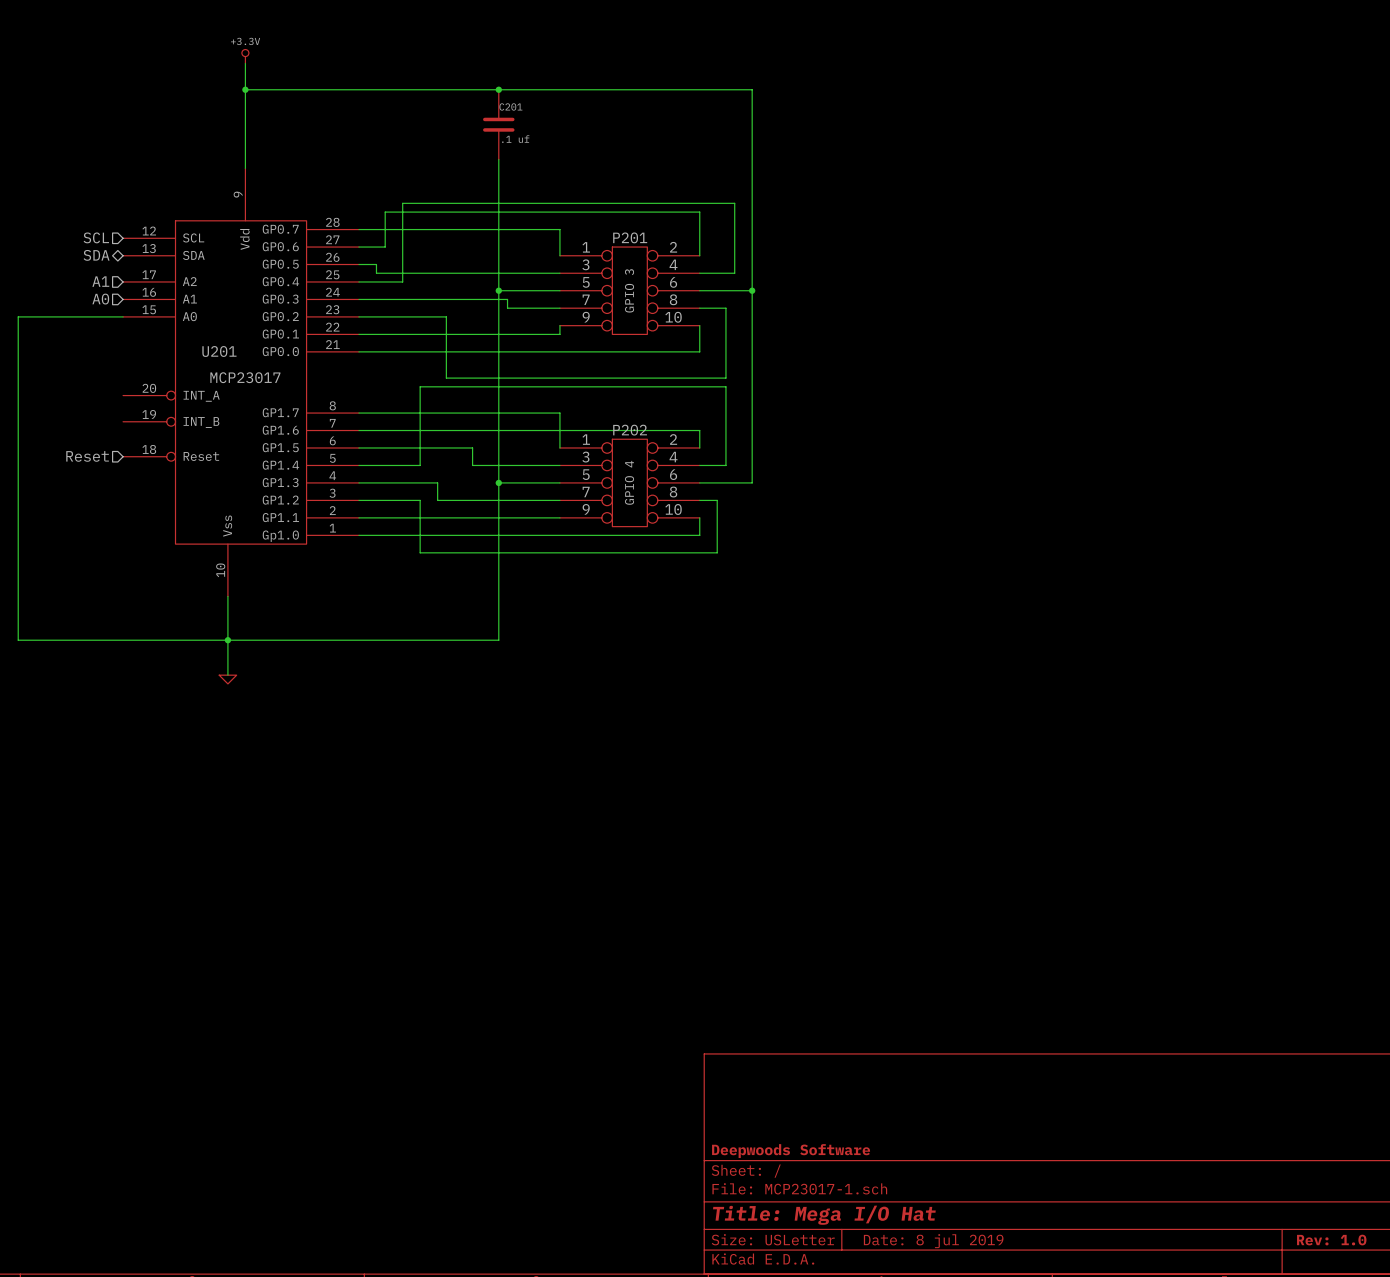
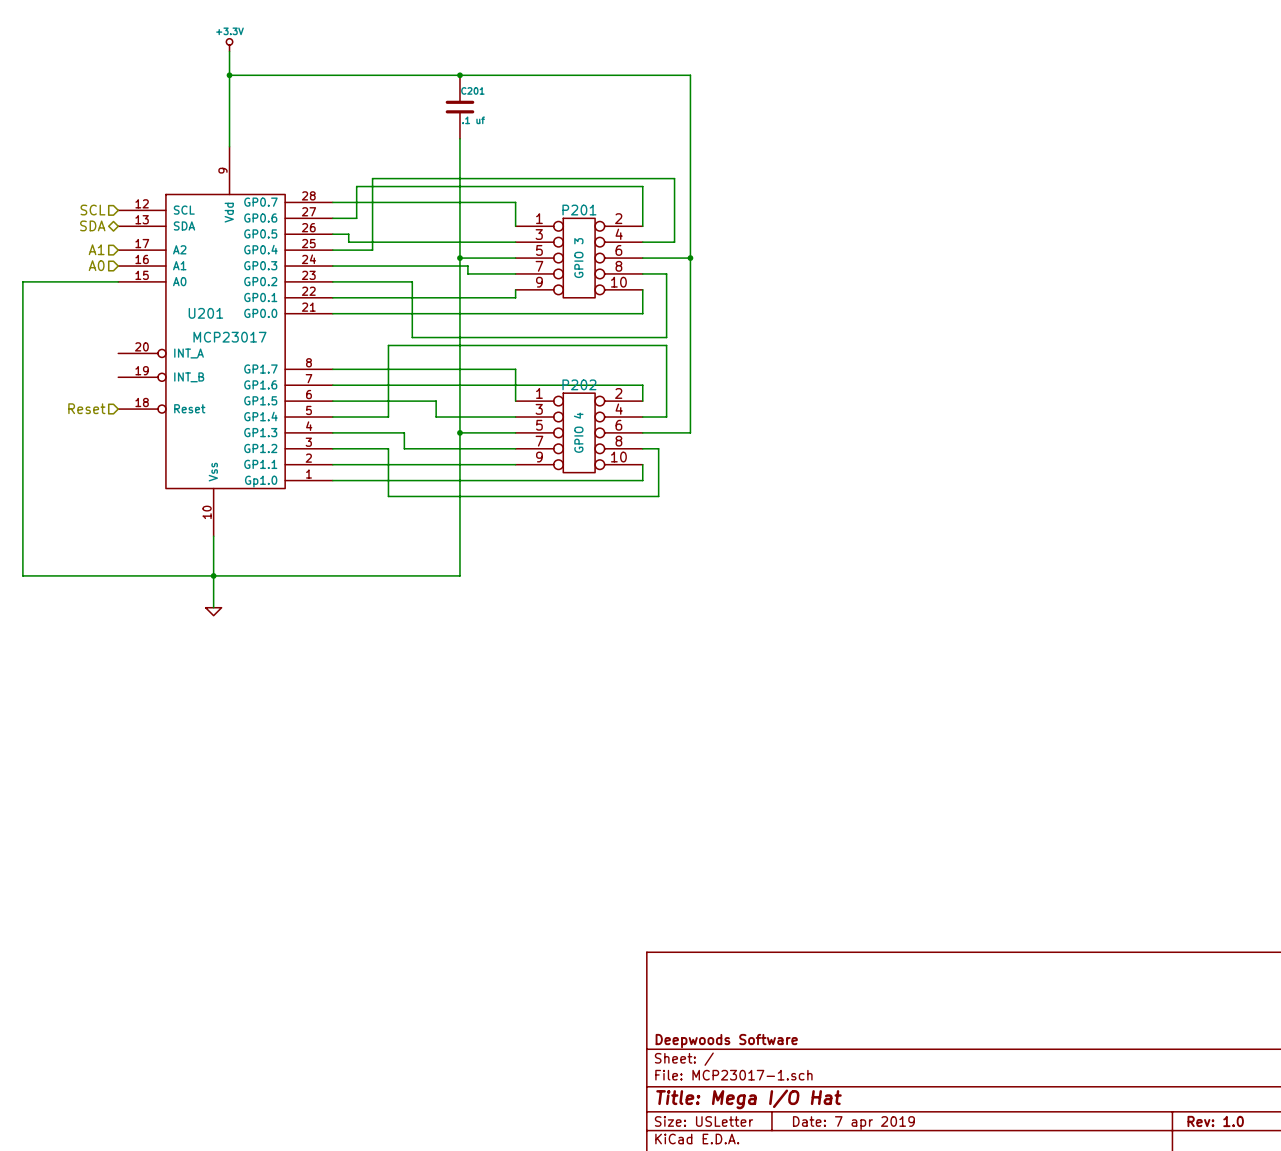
title block: Date: 8 jul 2019 (933, 1241) -> Date: 7 apr 2019 (853, 1123)

